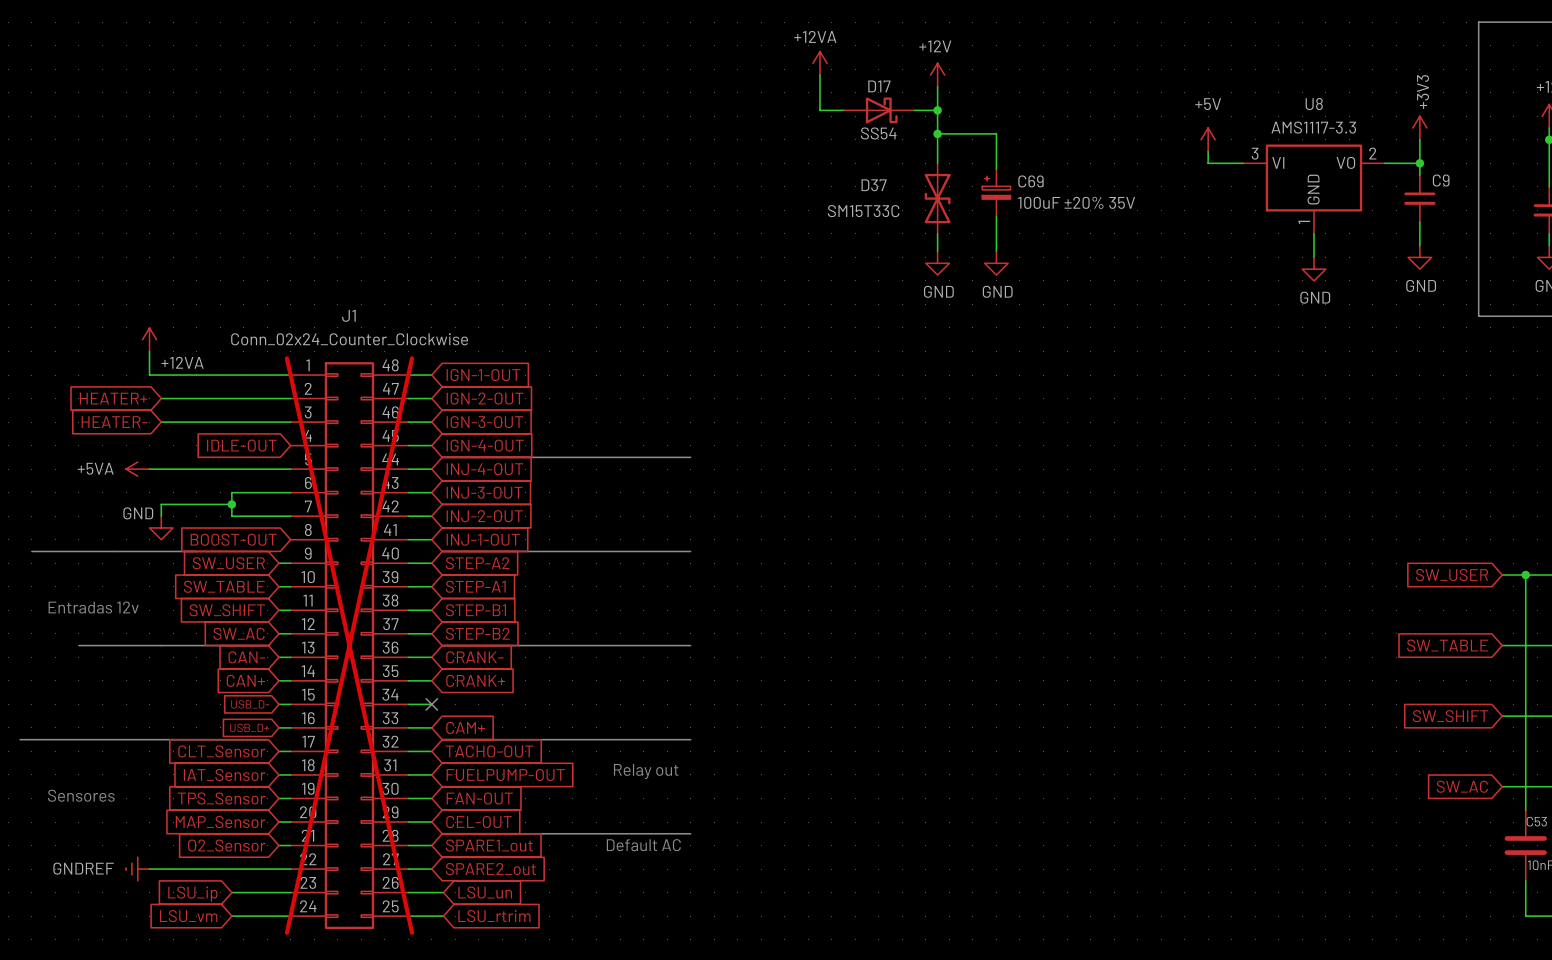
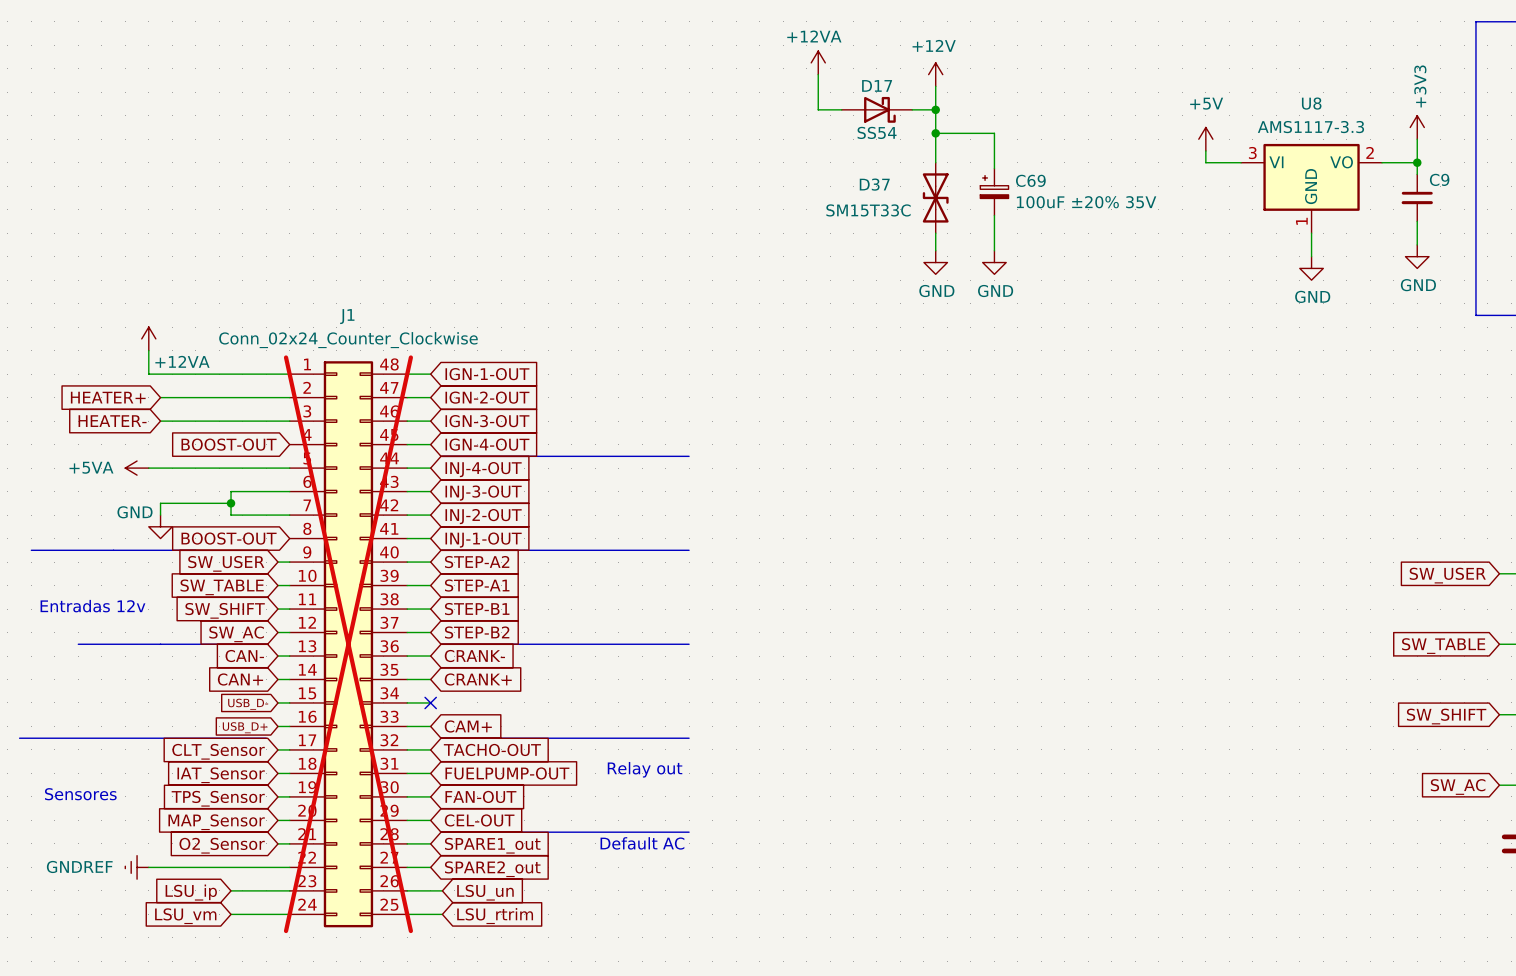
global label: IDLE-OUT (241, 445) -> BOOST-OUT (229, 444)

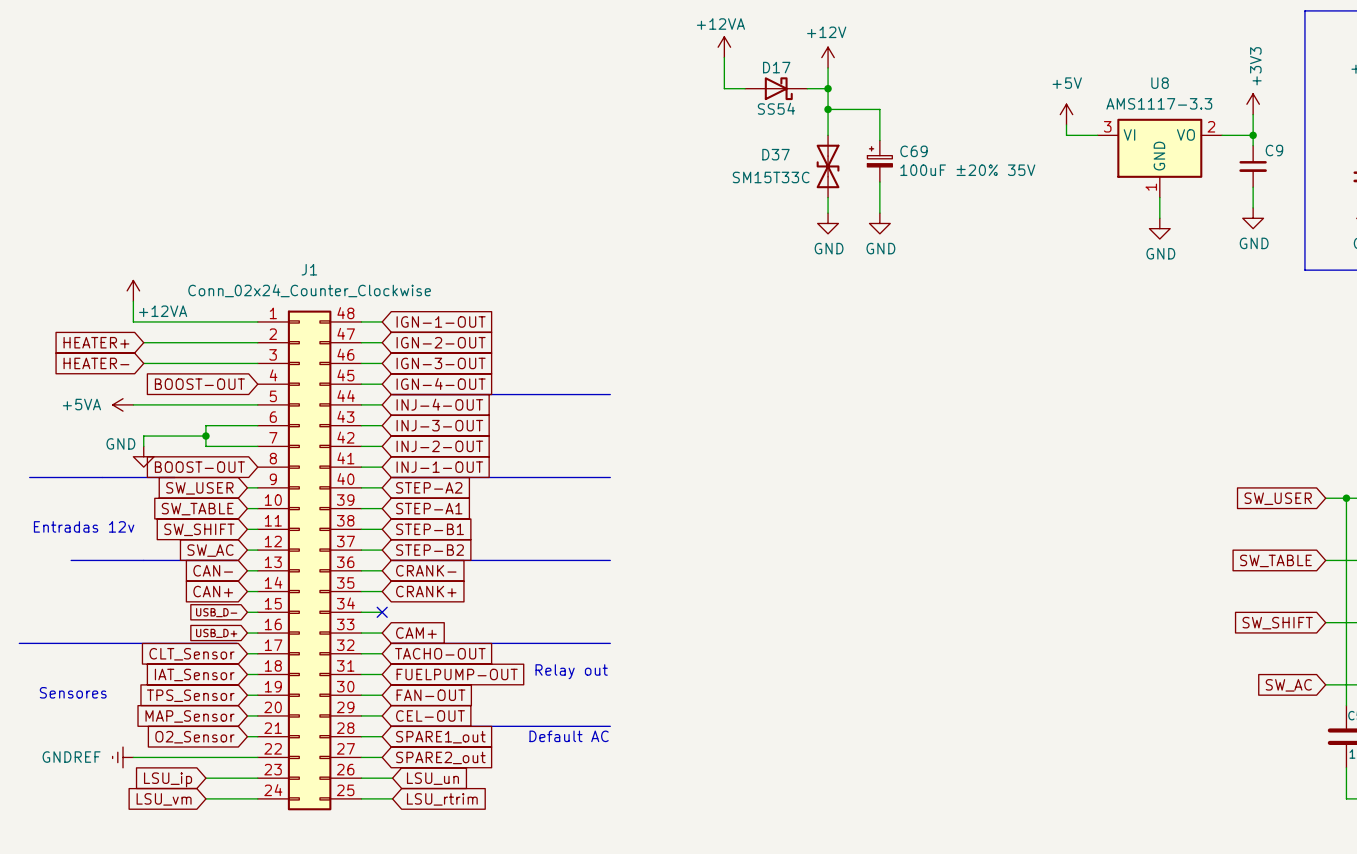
J1 do-not-place cross: (348, 644) -> none

